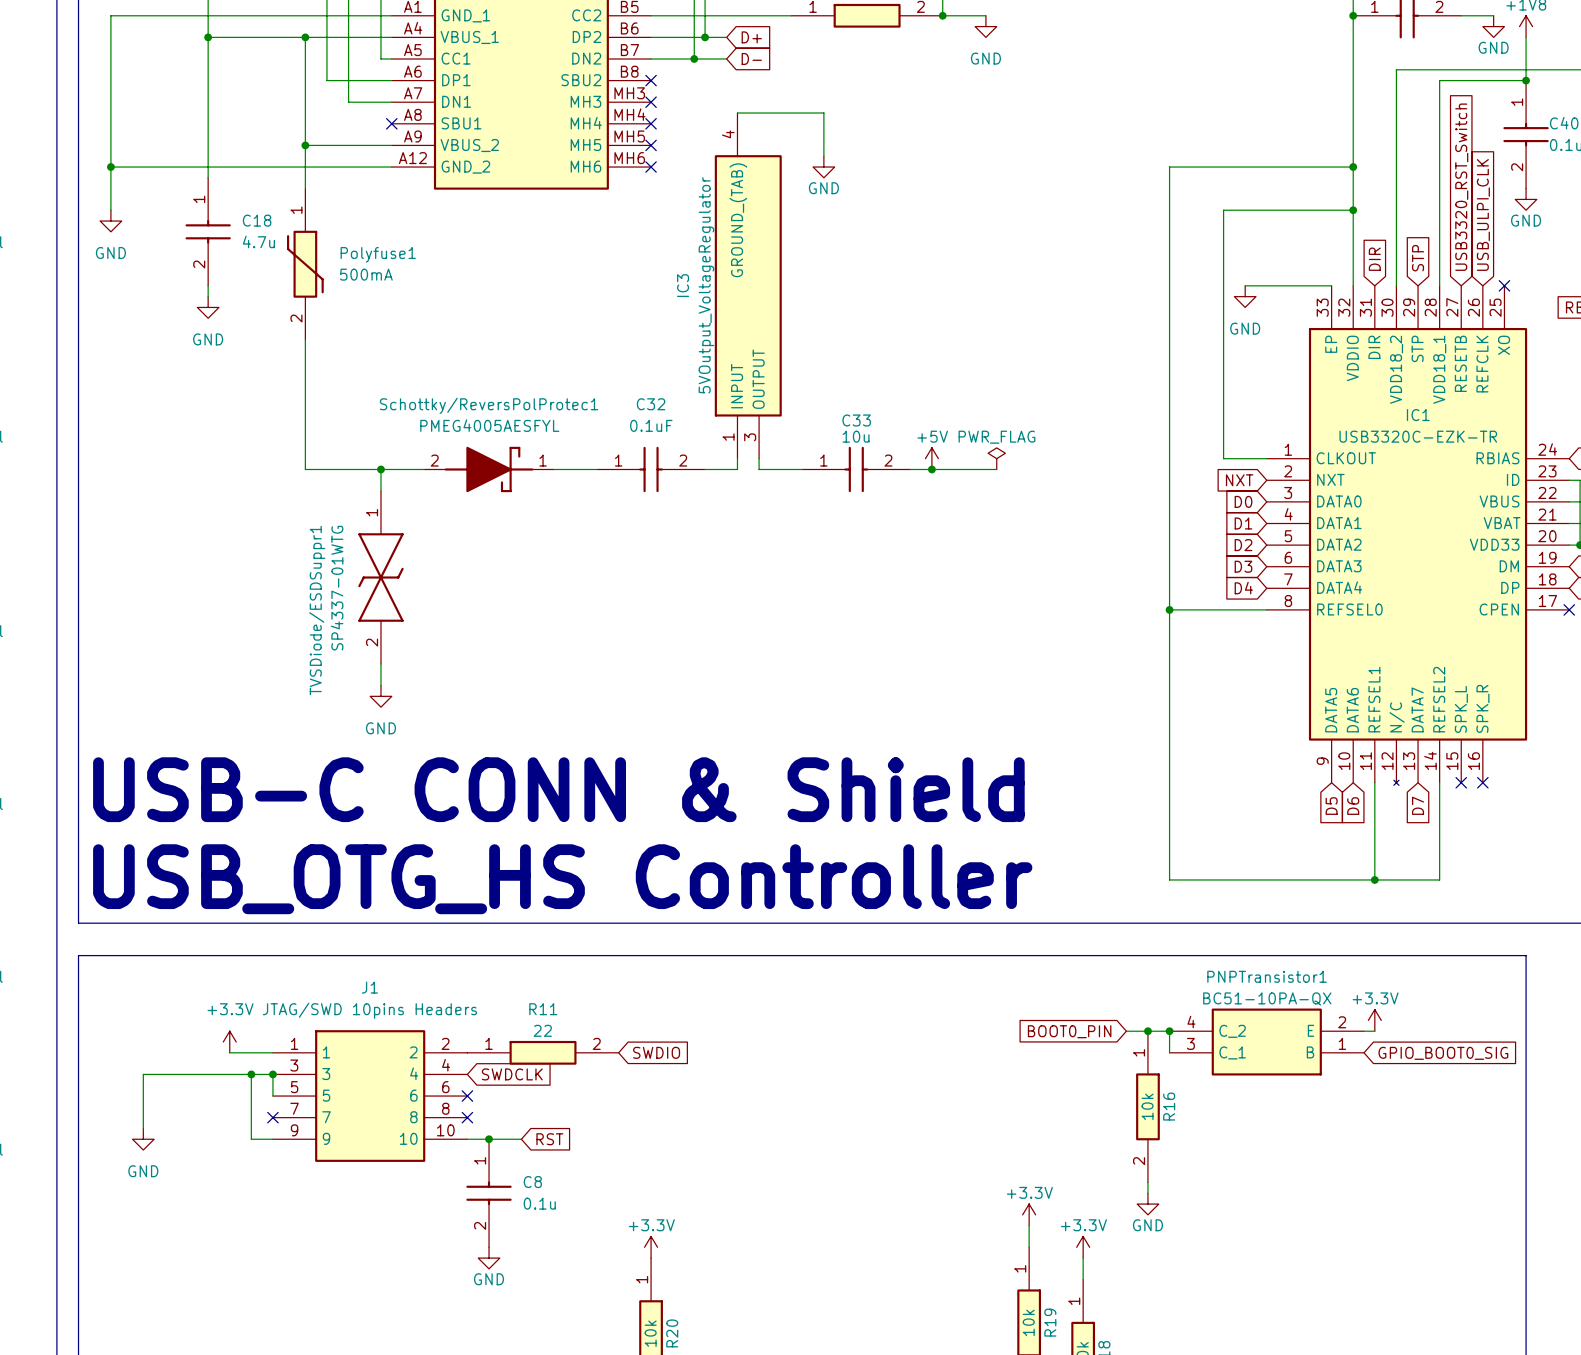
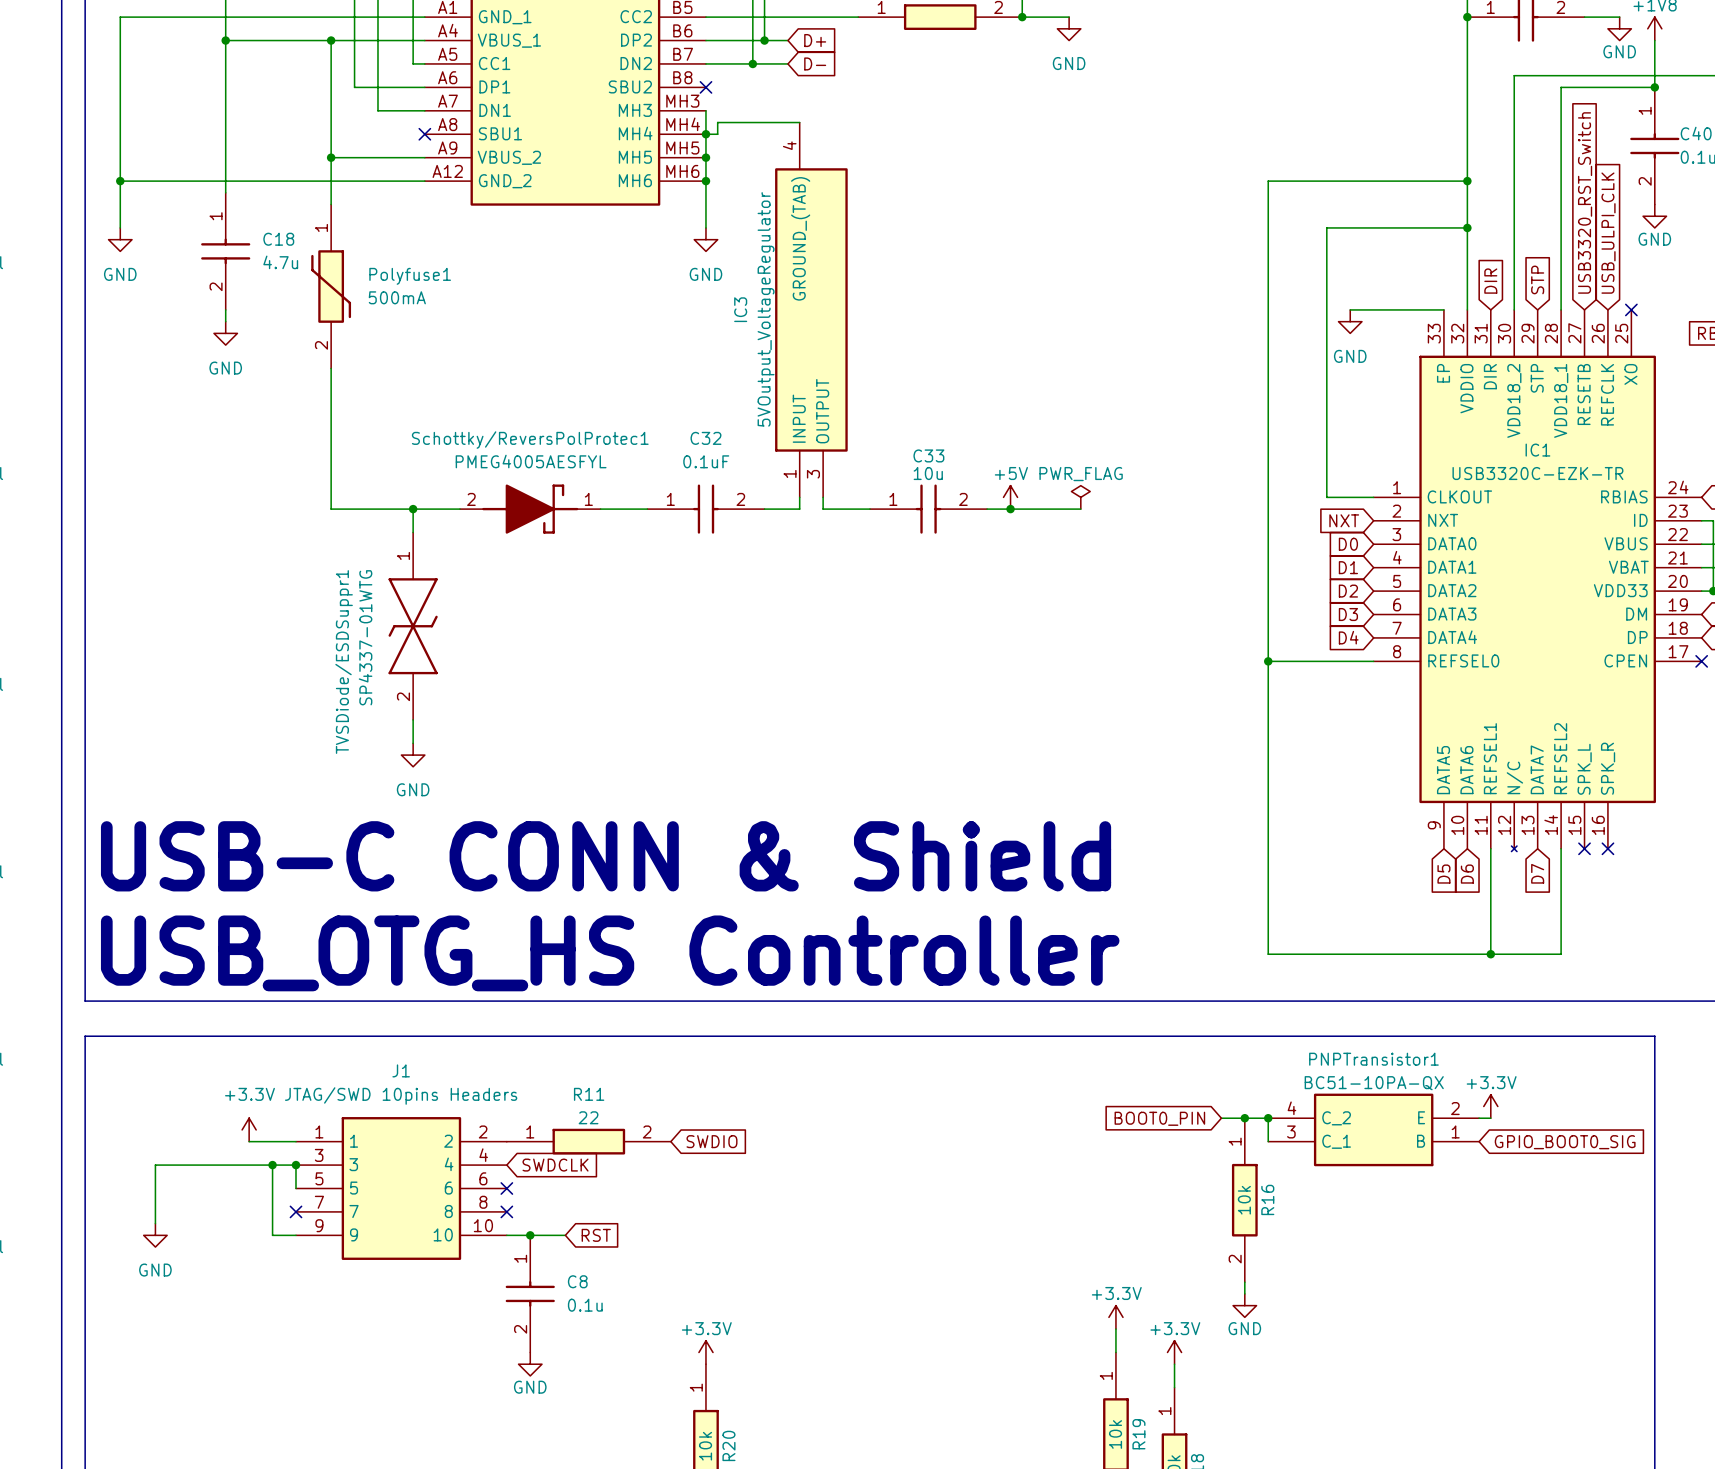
wire: none -> (705, 110) (705, 227)
no-connect mark: (651, 102) -> none
wire: (737, 113) (823, 113) (823, 156) -> (799, 122) (717, 122) (717, 134) (705, 134)
no-connect mark: (651, 123) -> none
junction: none -> (705, 134)
no-connect mark: (651, 145) -> none
junction: none -> (705, 157)
no-connect mark: (651, 167) -> none
junction: none -> (705, 181)
power symbol position: GND (823, 167) -> GND (705, 239)
power symbol text position: GND (823, 188) -> GND (705, 274)

